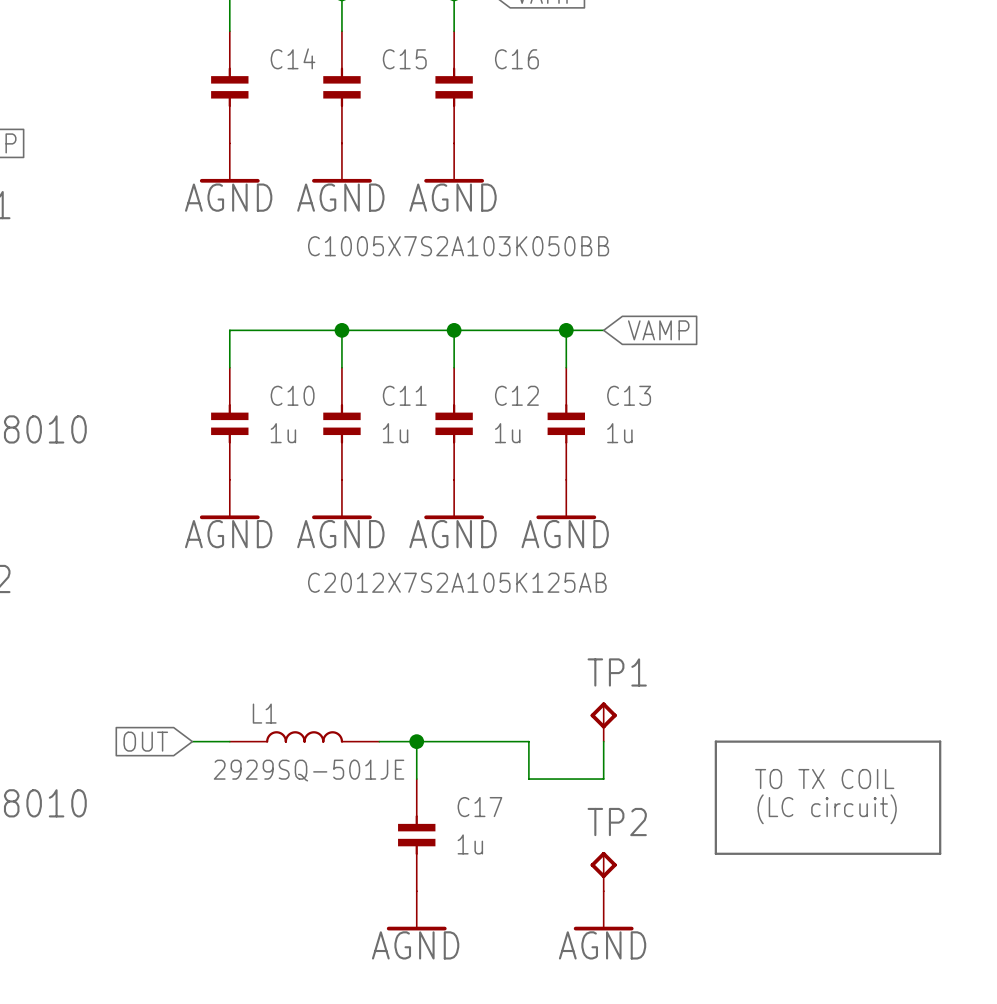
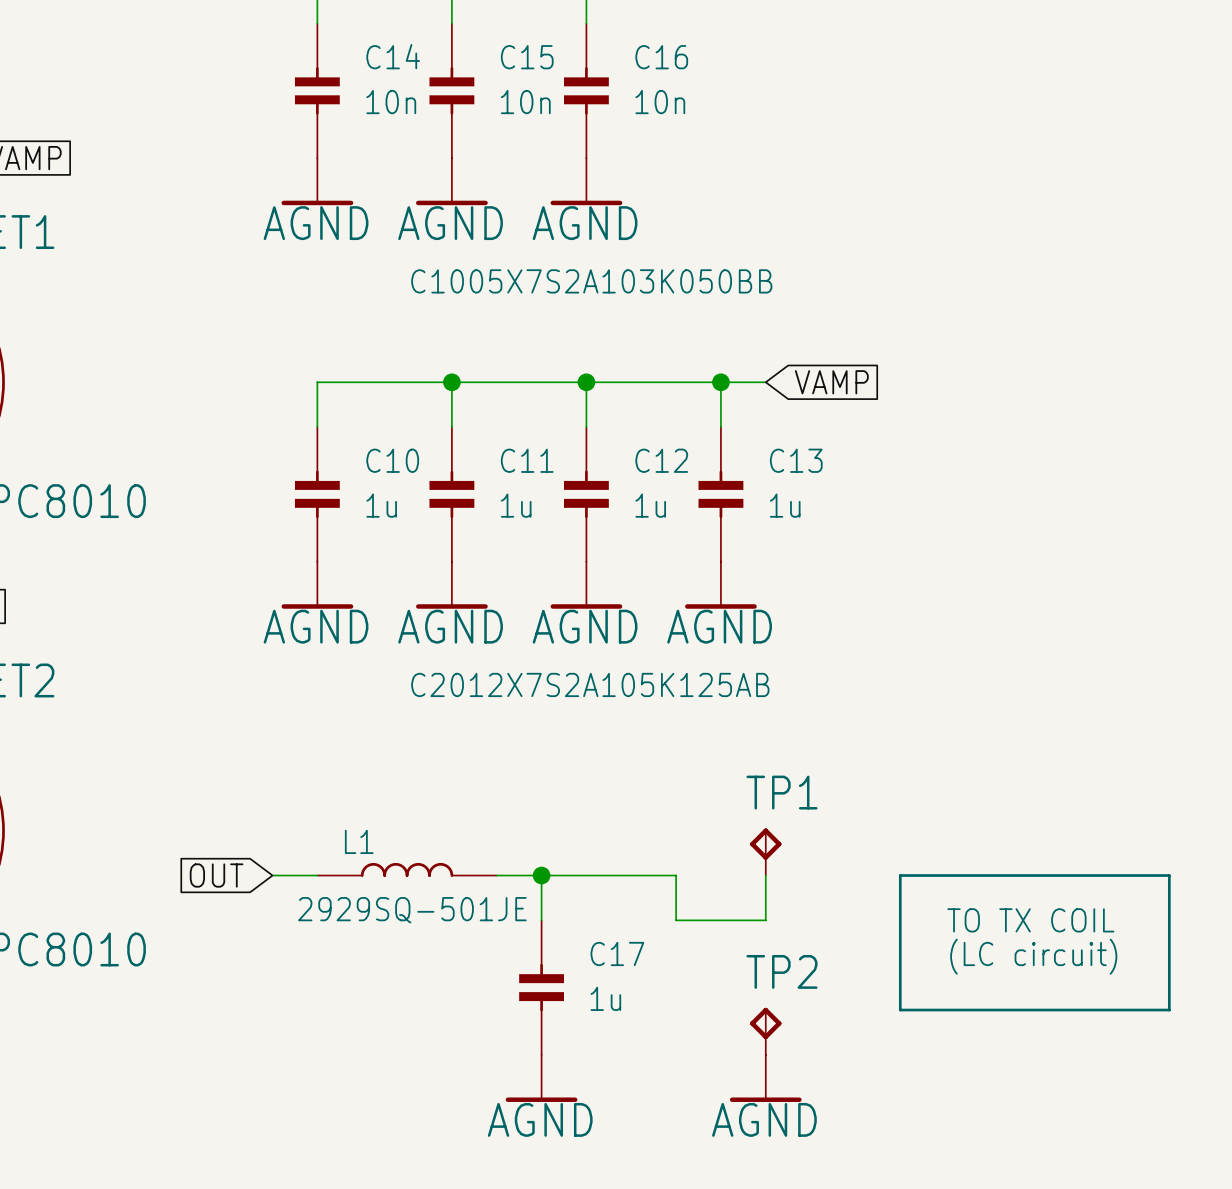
C14 value: none -> 10n (391, 102)
C15 value: none -> 10n (525, 102)
C16 value: none -> 10n (660, 102)

